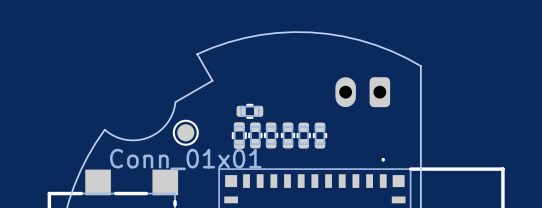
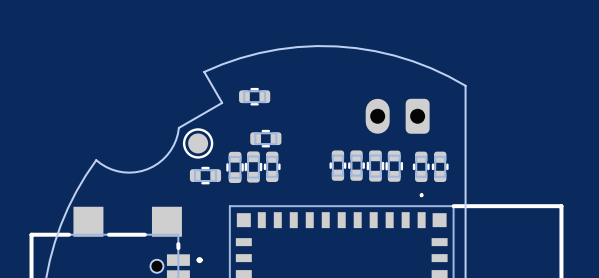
part: none -> (254, 96)
part: none -> (198, 143)
part: Conn_01x01 (185, 132) -> none
part: none -> (337, 165)
part: none -> (356, 165)
part: none -> (375, 166)
part: none -> (394, 166)
part: none -> (235, 167)
part: (271, 135) -> none
part: (288, 135) -> none
part: (303, 135) -> none
part: (320, 135) -> none
part: none -> (421, 166)
part: none -> (440, 166)
part: none -> (205, 175)

